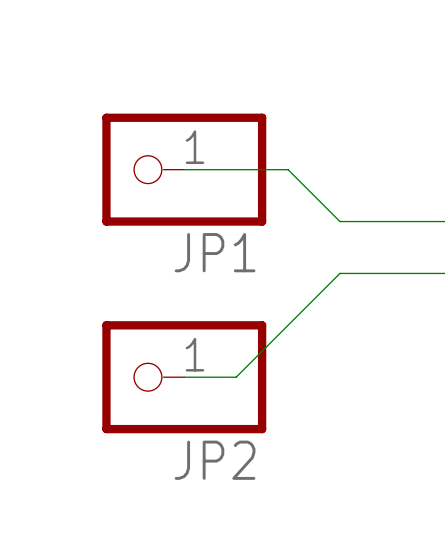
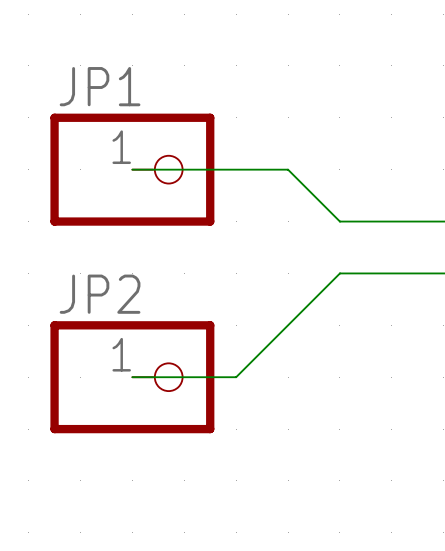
wire: none -> (132, 169) (184, 169)
JP1 rotation: 0° (184, 169) -> 180° (132, 169)
wire: none -> (132, 377) (184, 377)
JP2 rotation: 0° (184, 377) -> 180° (132, 377)

